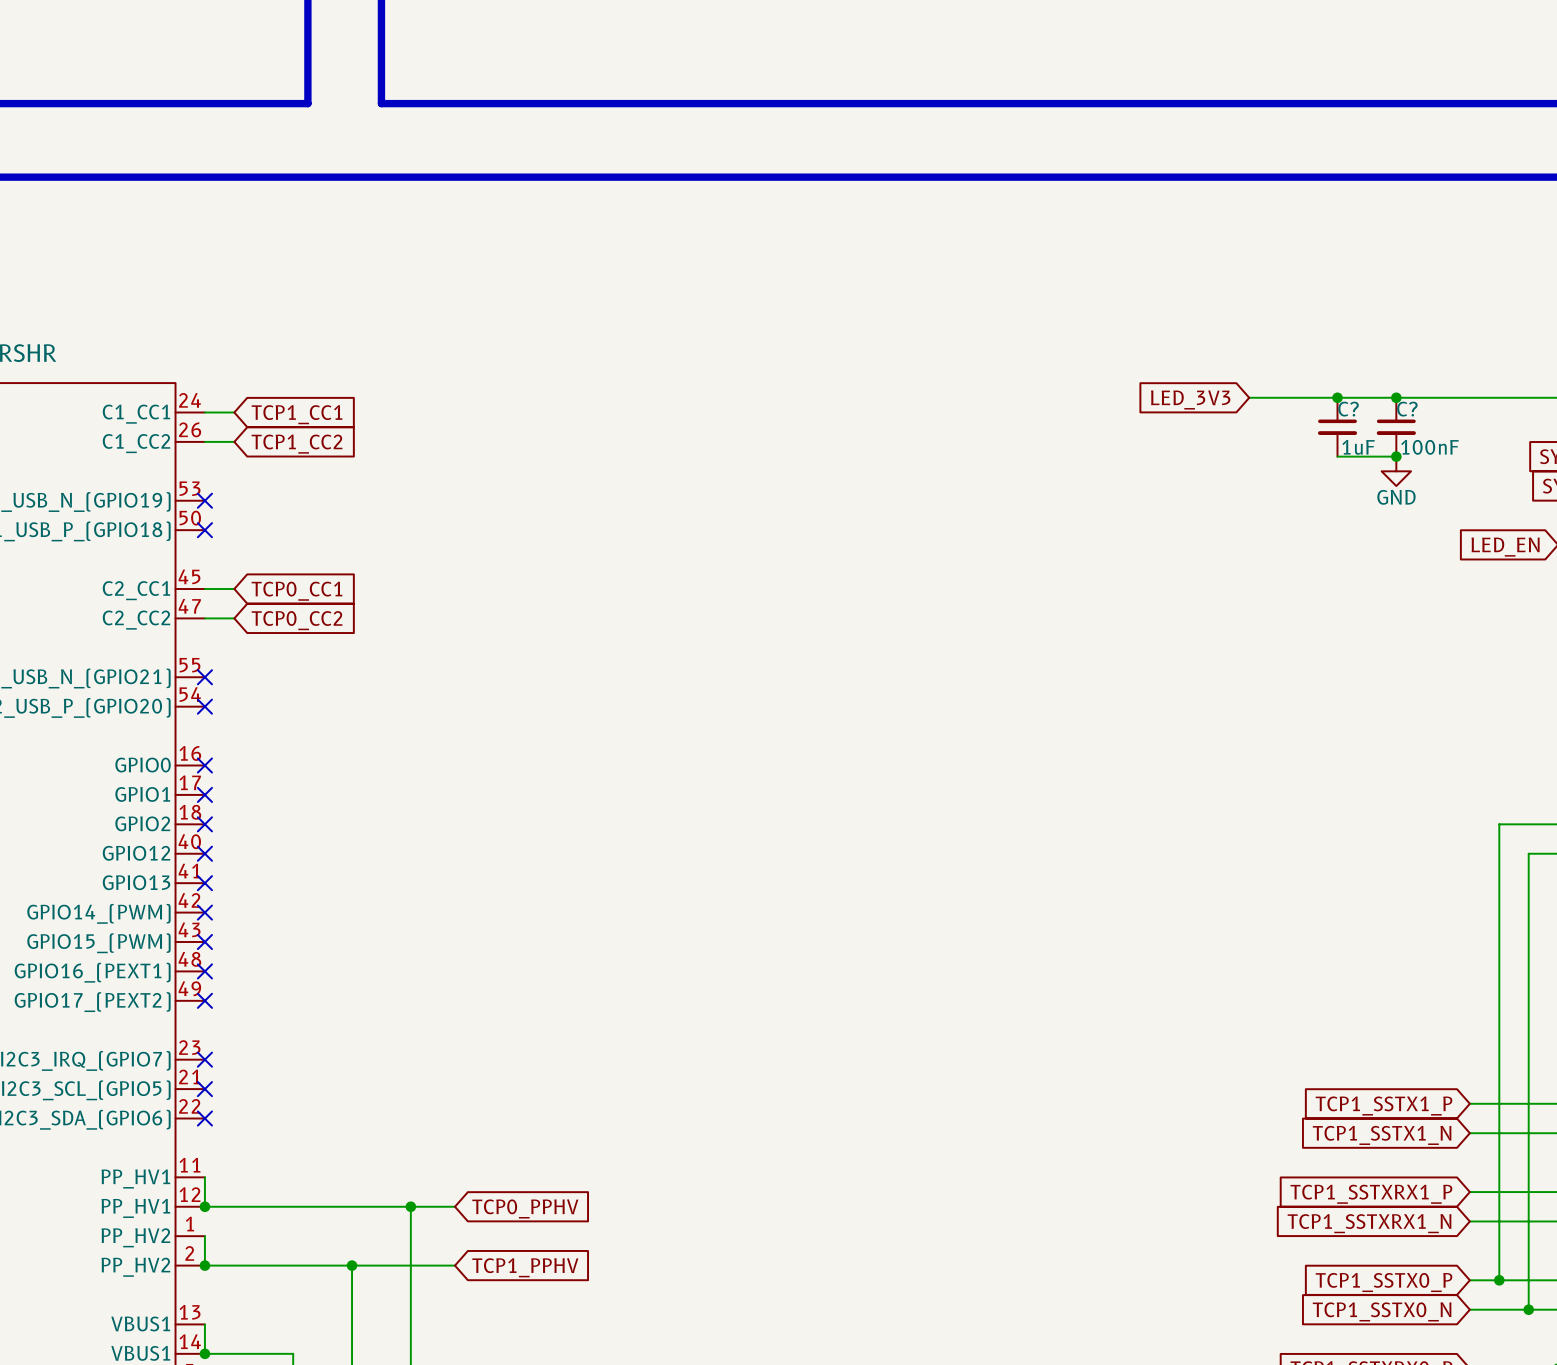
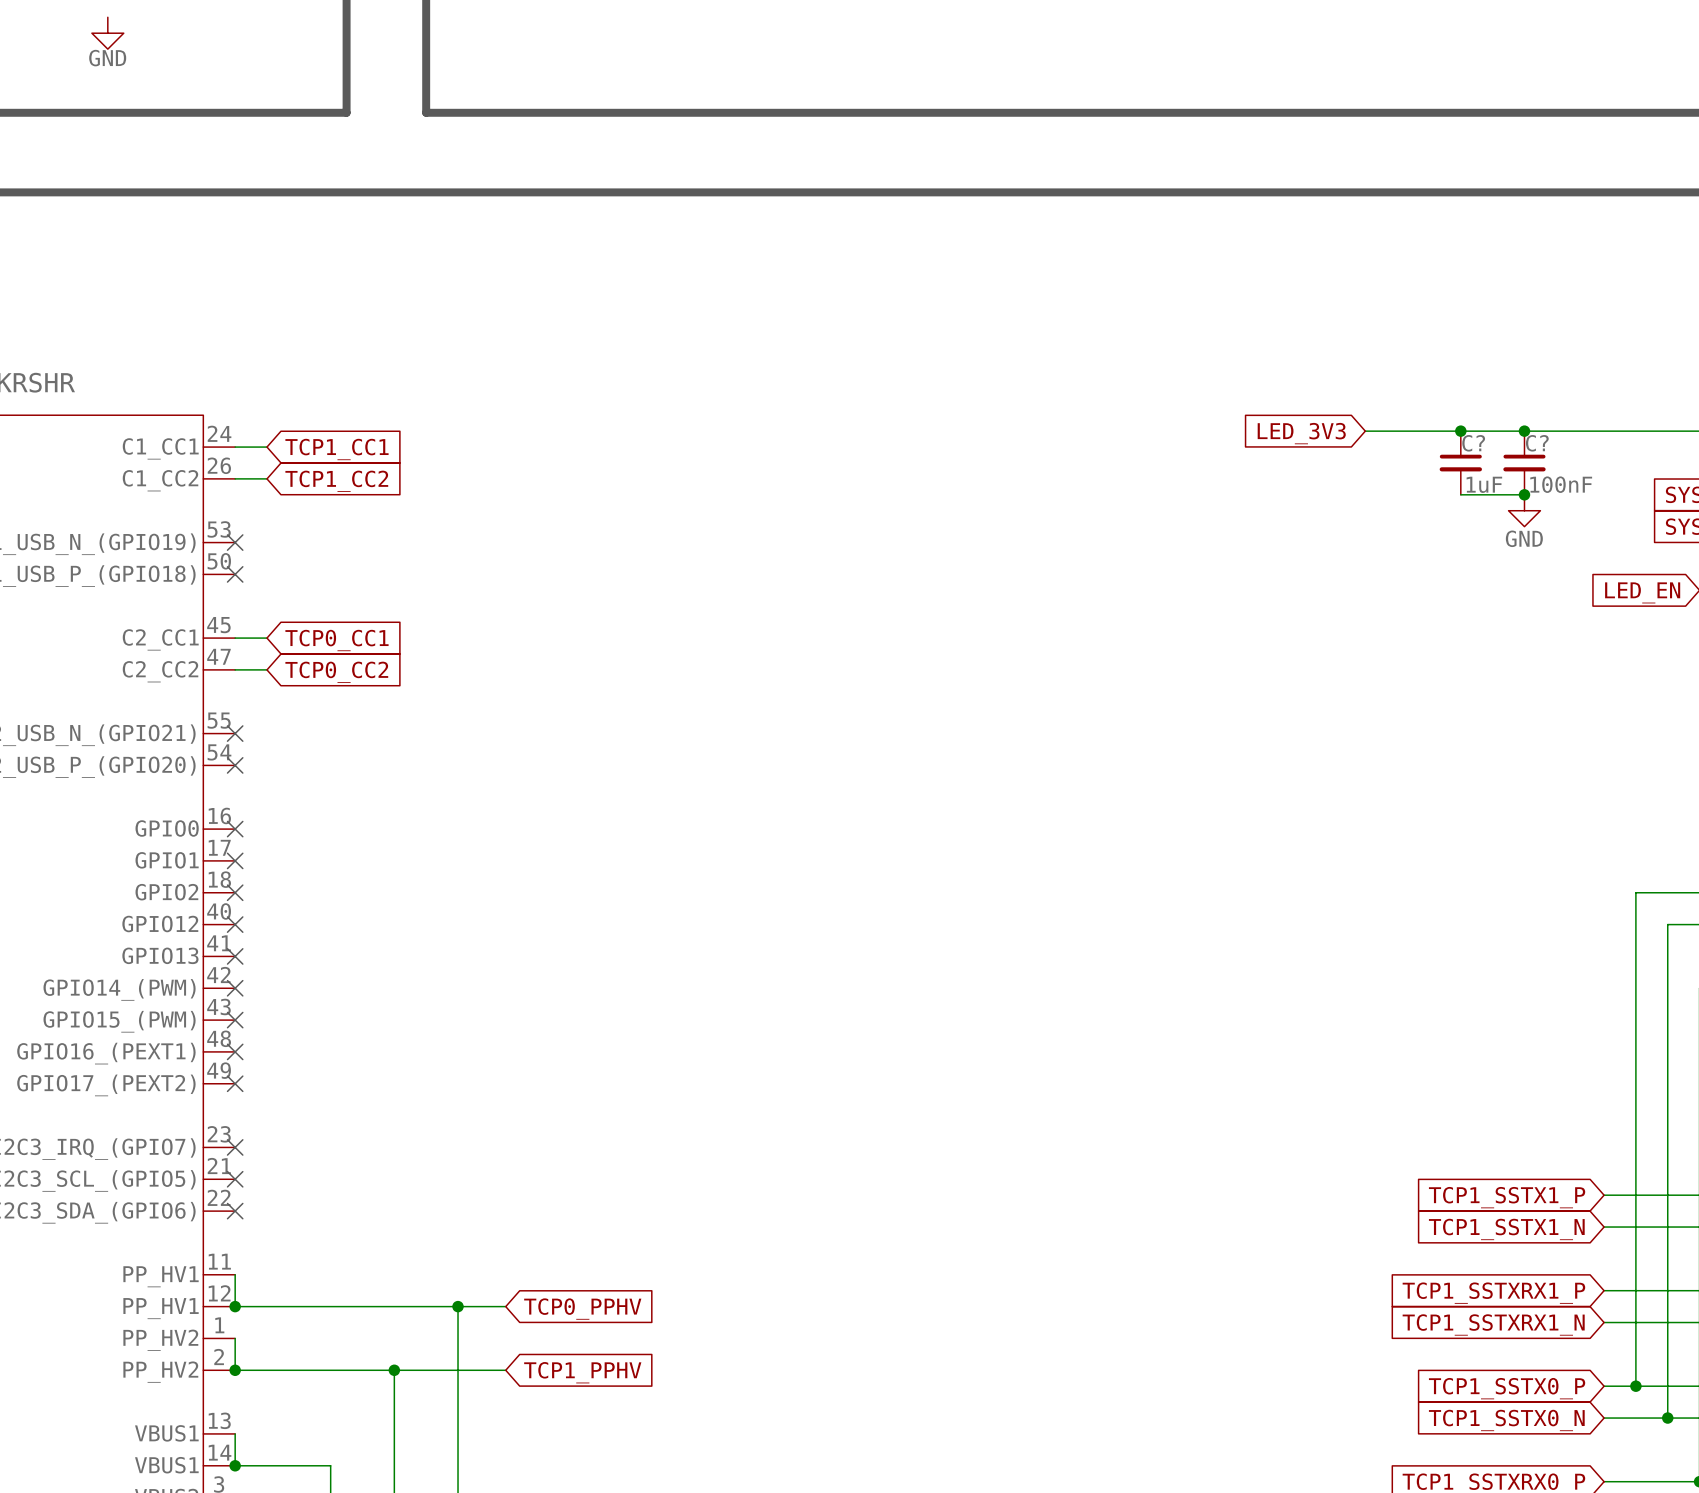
power symbol: none -> GND (107, 33)

